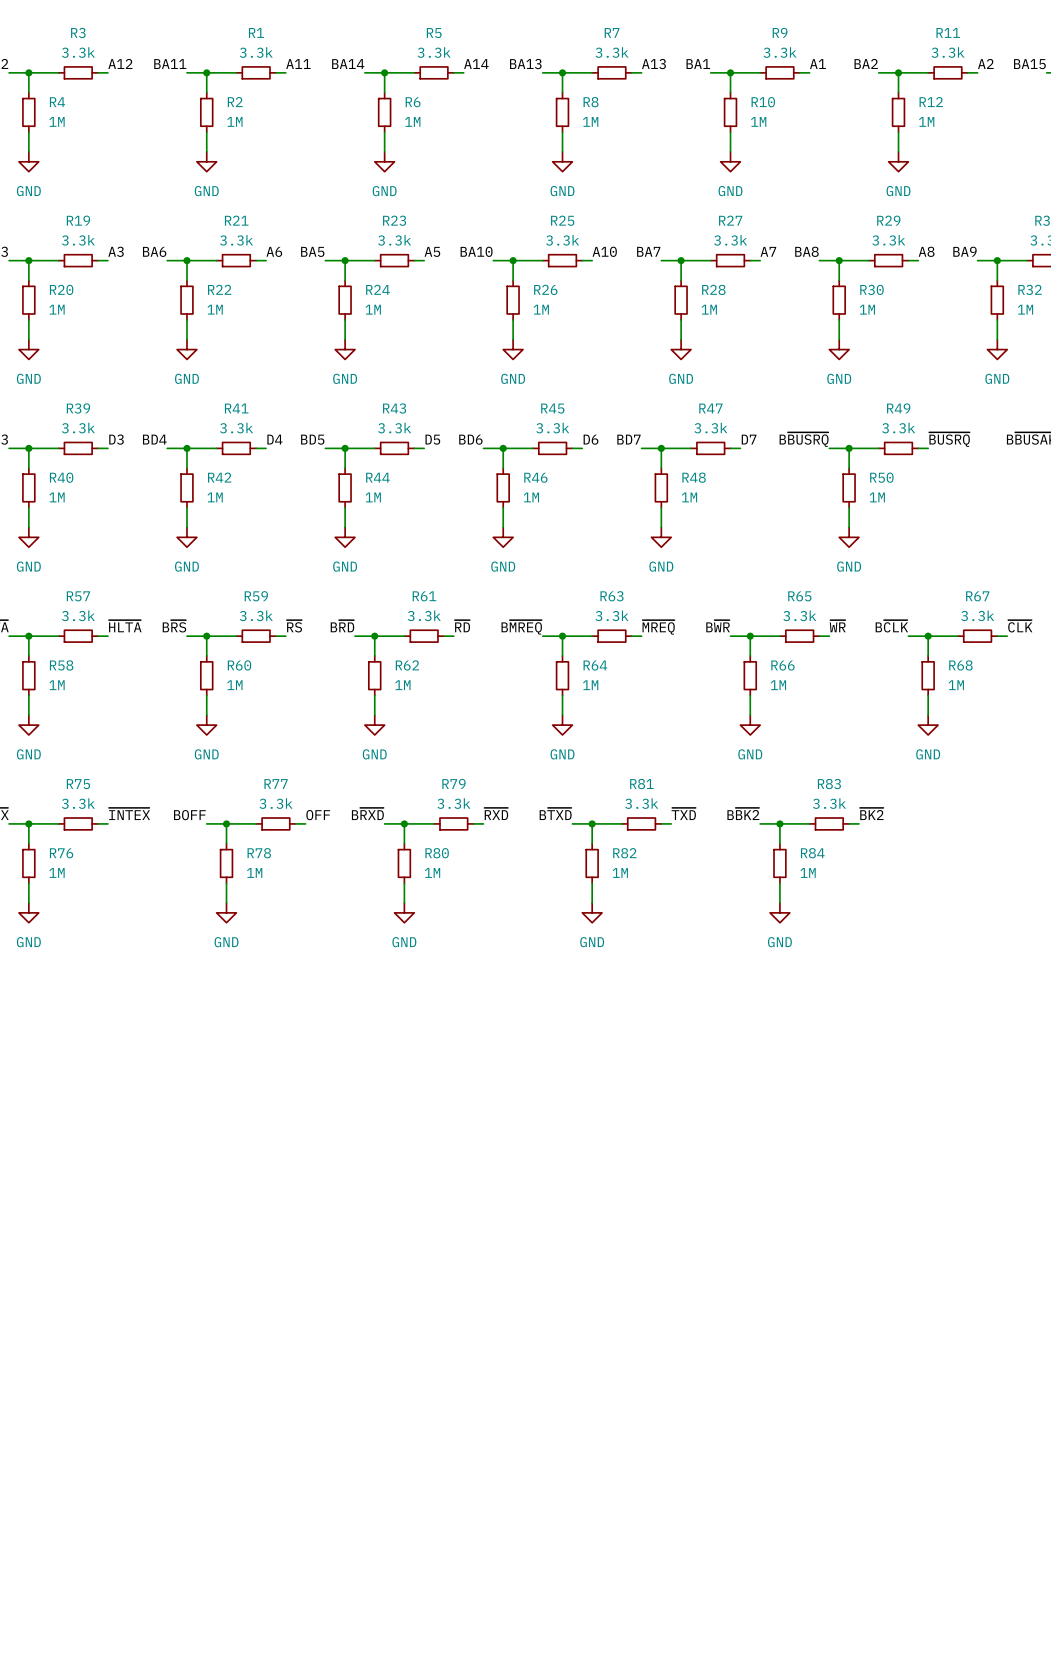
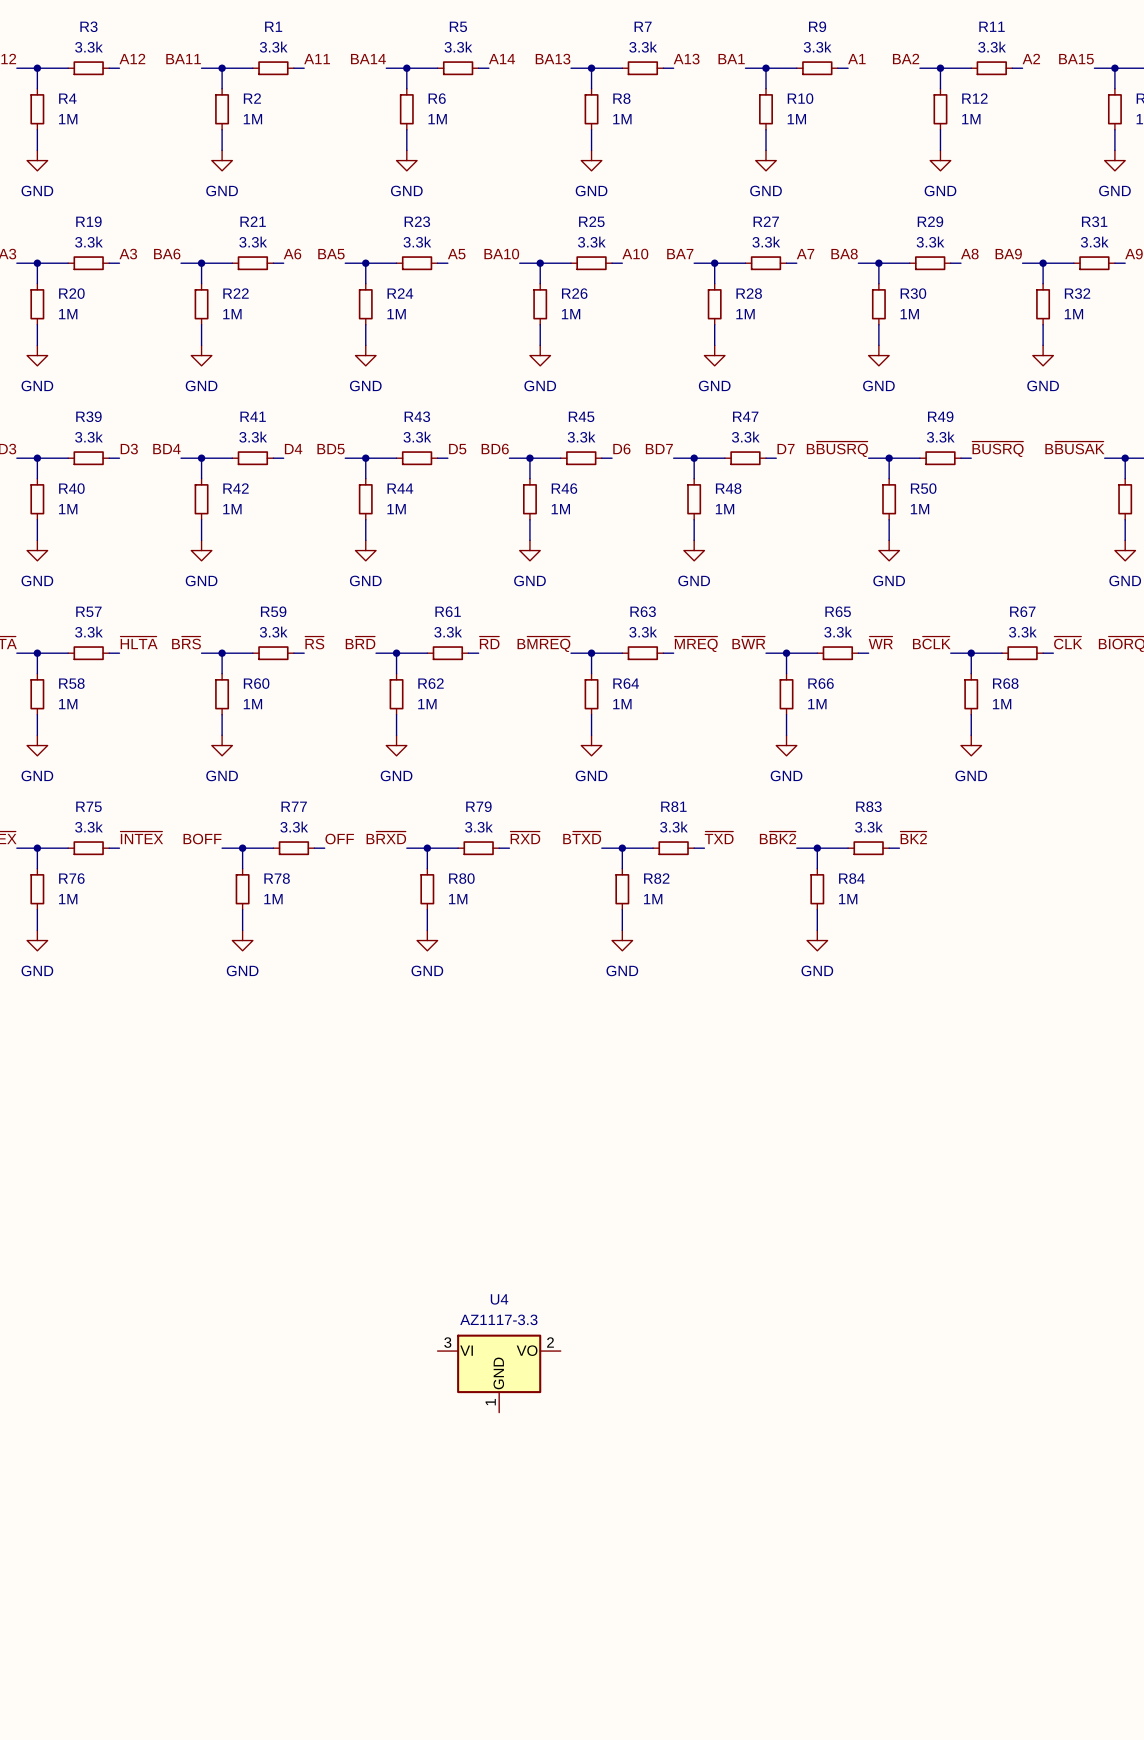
U4: none -> AZ1117-3.3 (499, 1373)

